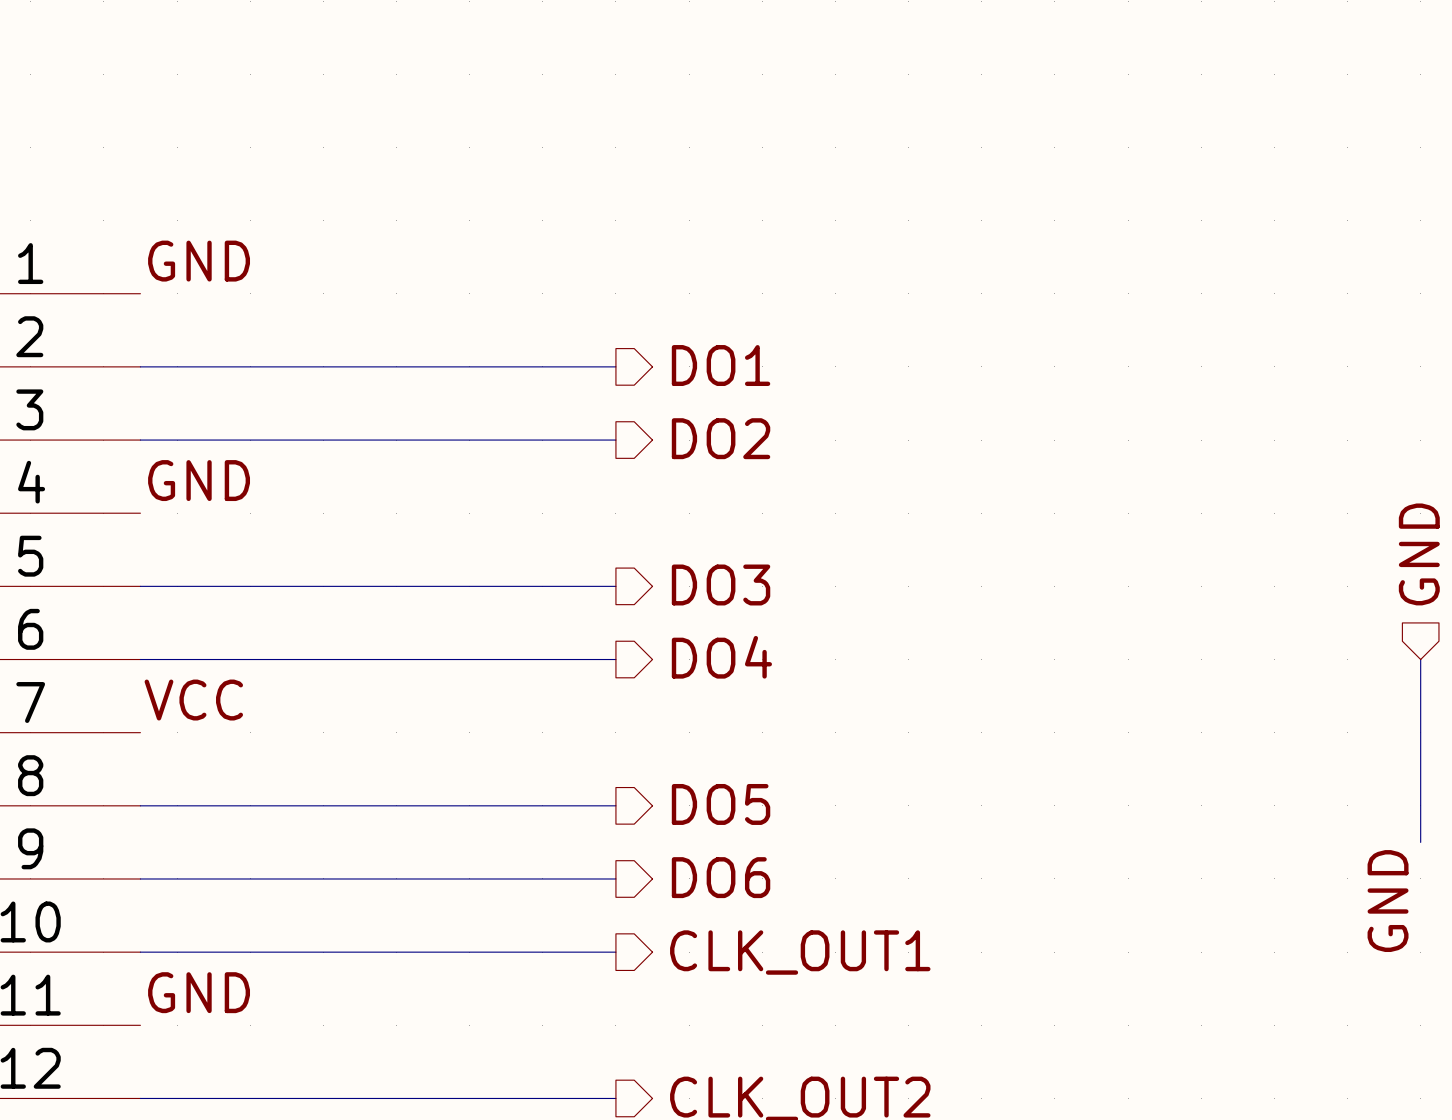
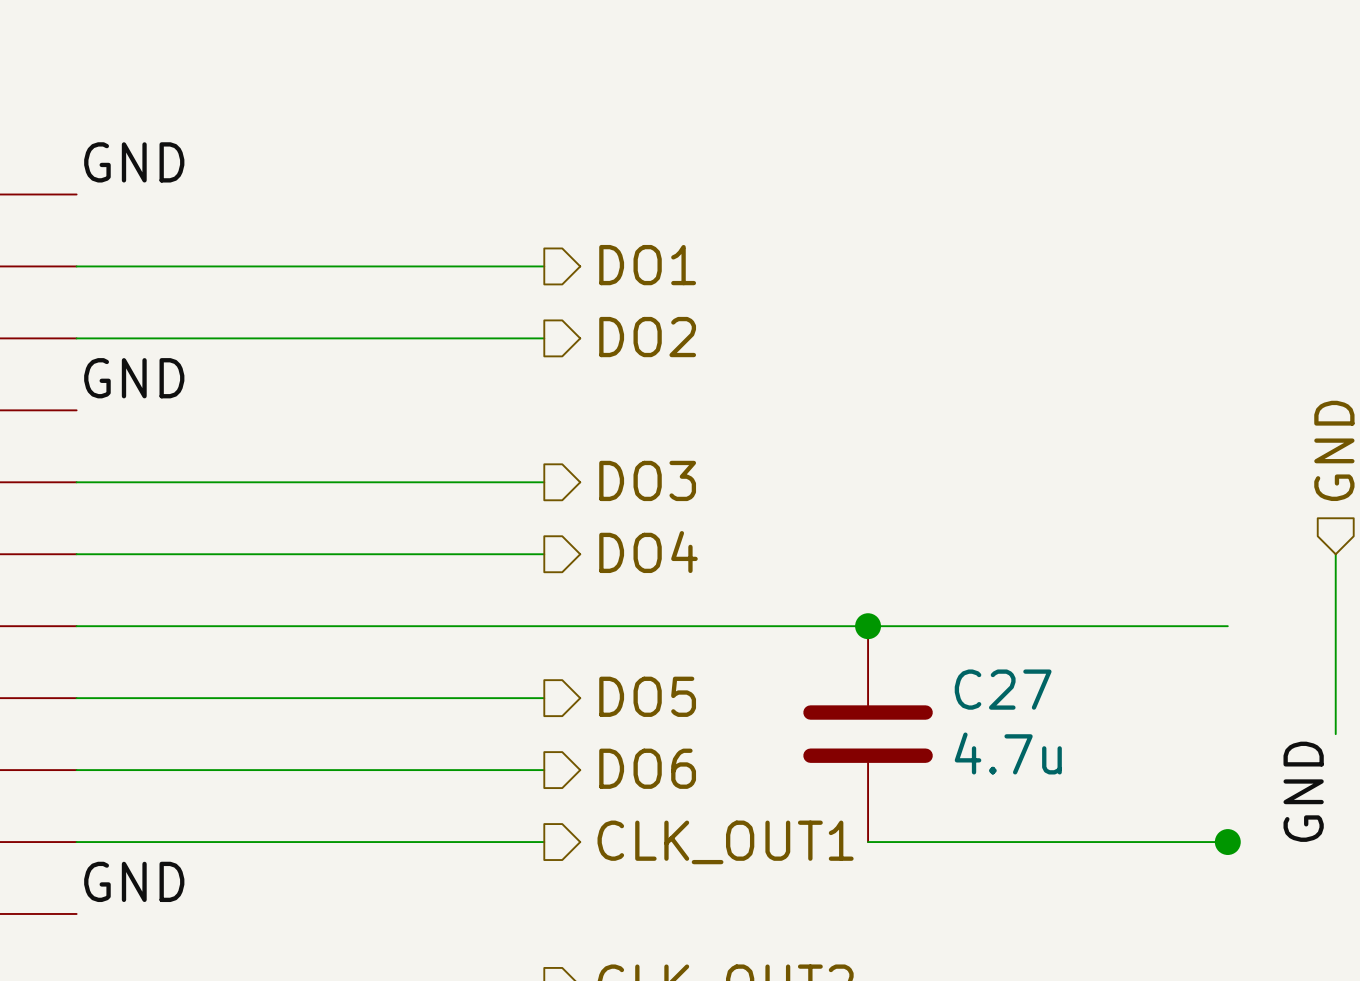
label: VCC (193, 700) -> none
wire: none -> (76, 626) (1227, 626)
junction: none -> (868, 626)
C27: none -> 4.7u (868, 734)
wire: none -> (868, 842) (1227, 842)
junction: none -> (1227, 842)

